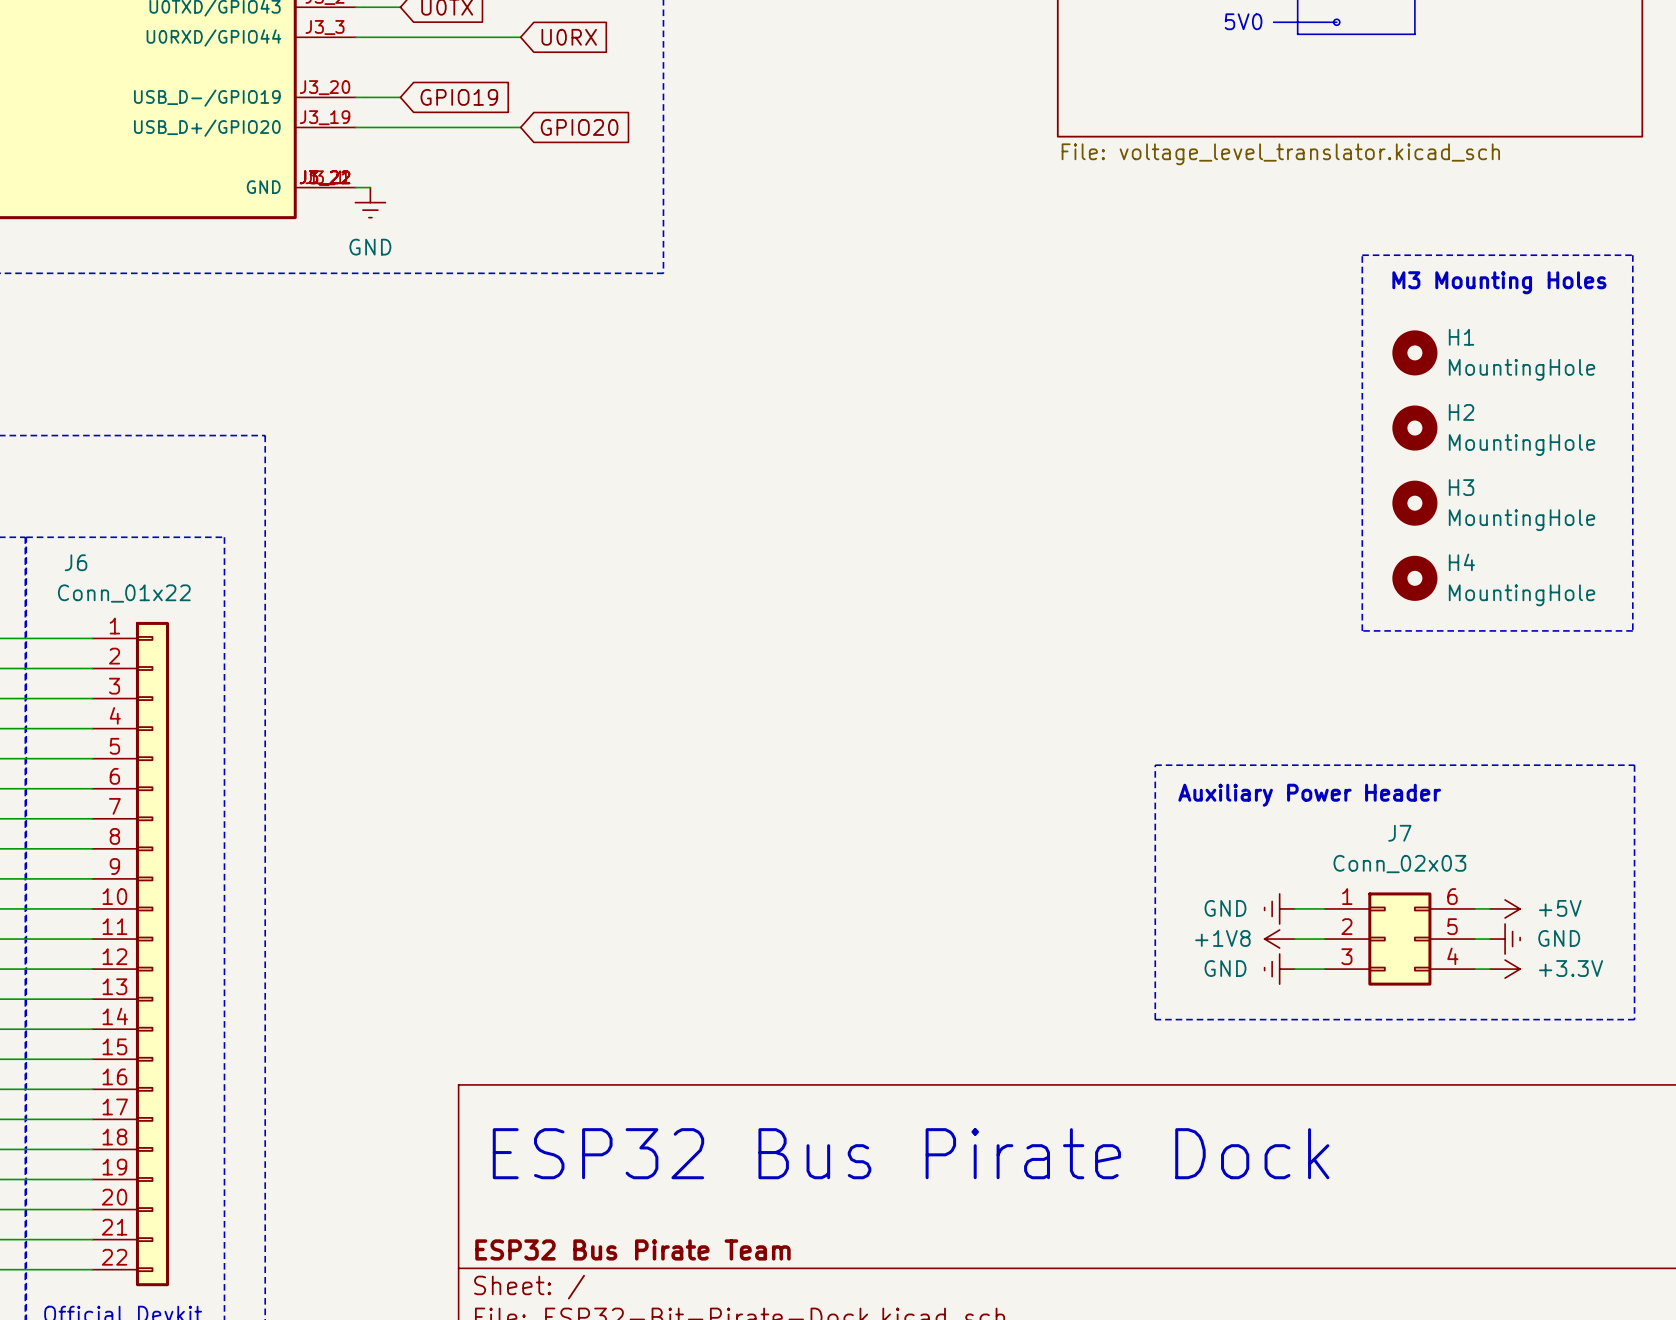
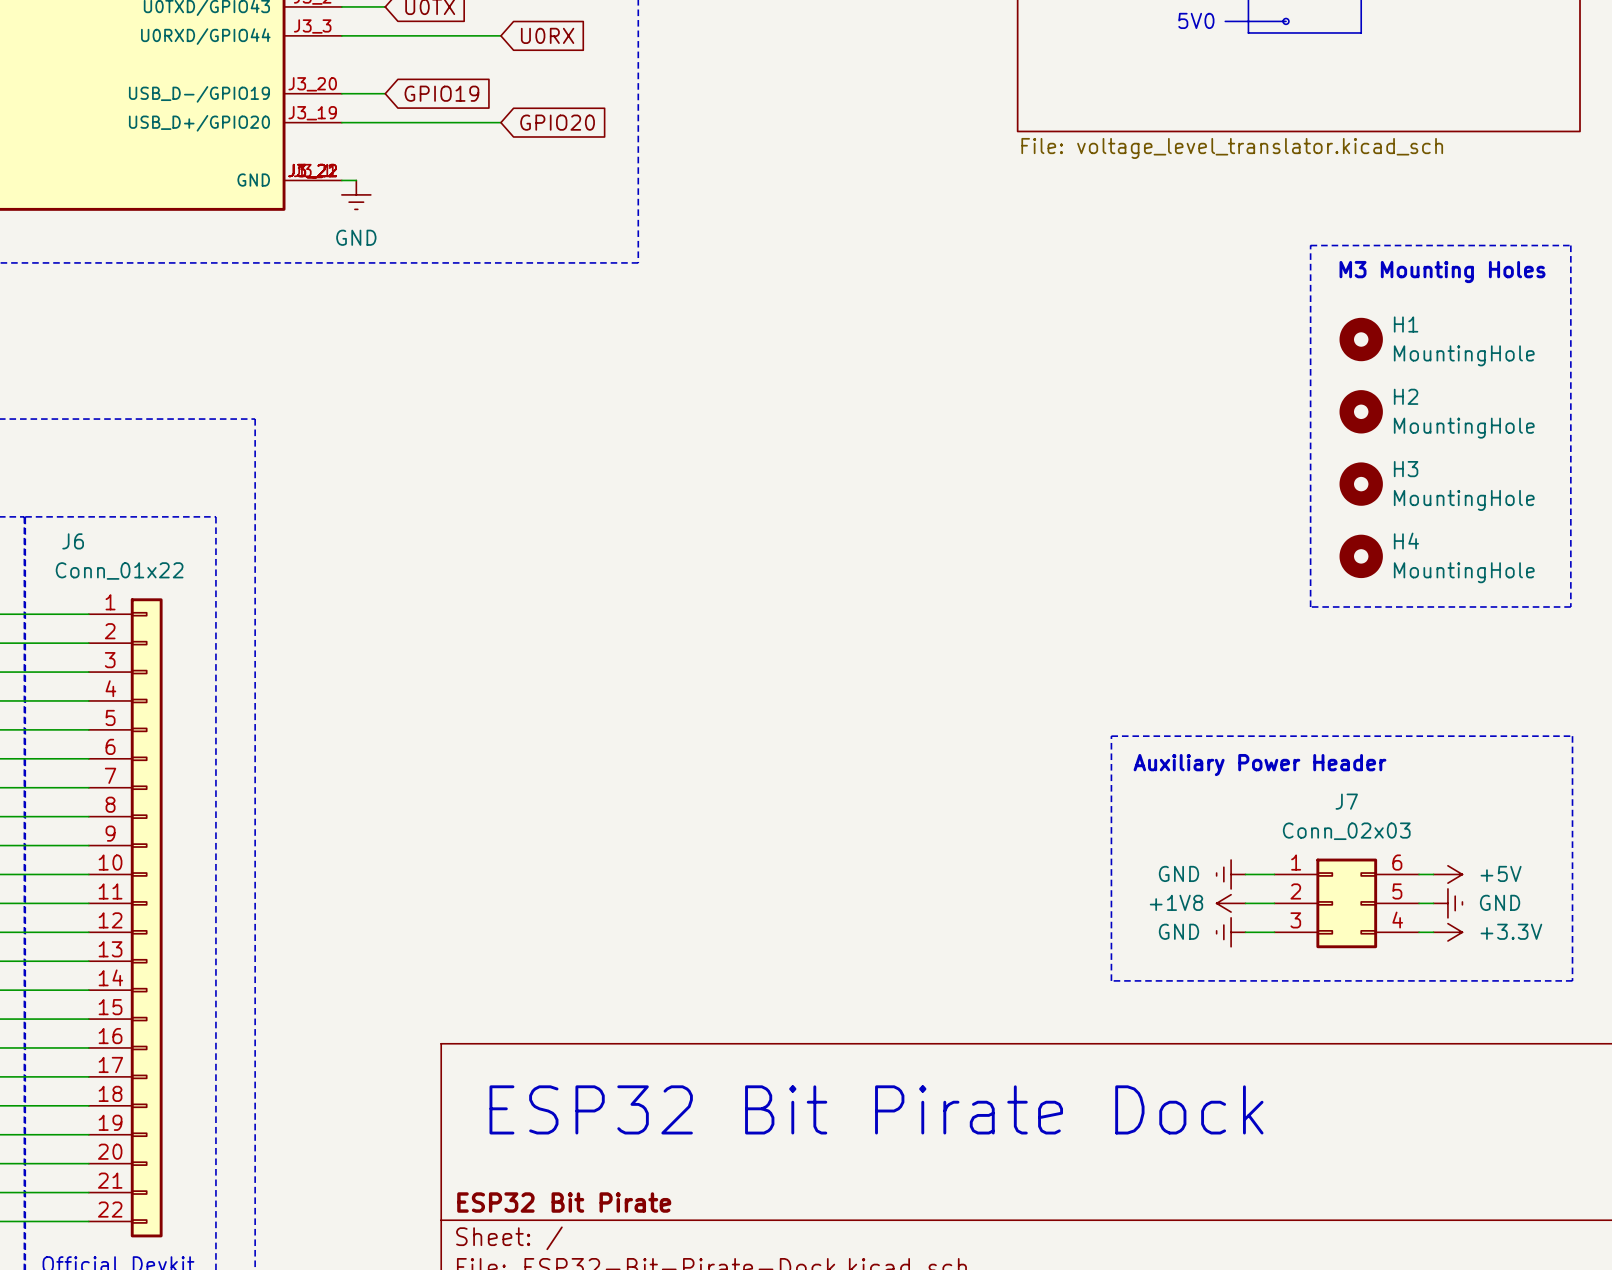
text: ESP32 Bus Pirate Dock (911, 1153) -> ESP32 Bit Pirate Dock (876, 1109)
title block: ESP32 Bus Pirate Team (632, 1249) -> ESP32 Bit Pirate (564, 1202)

